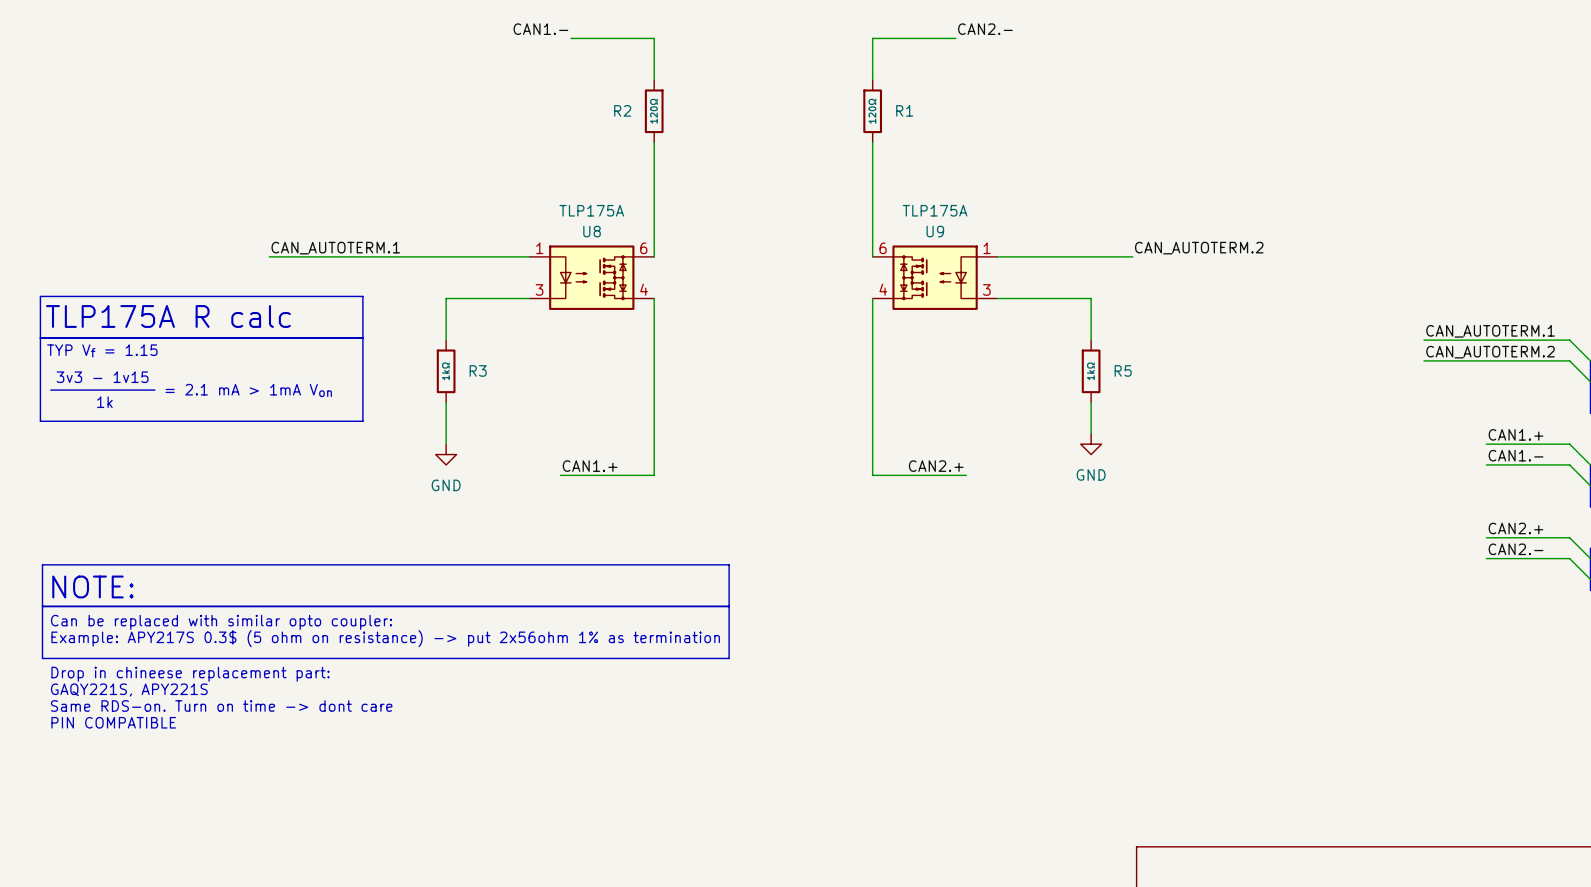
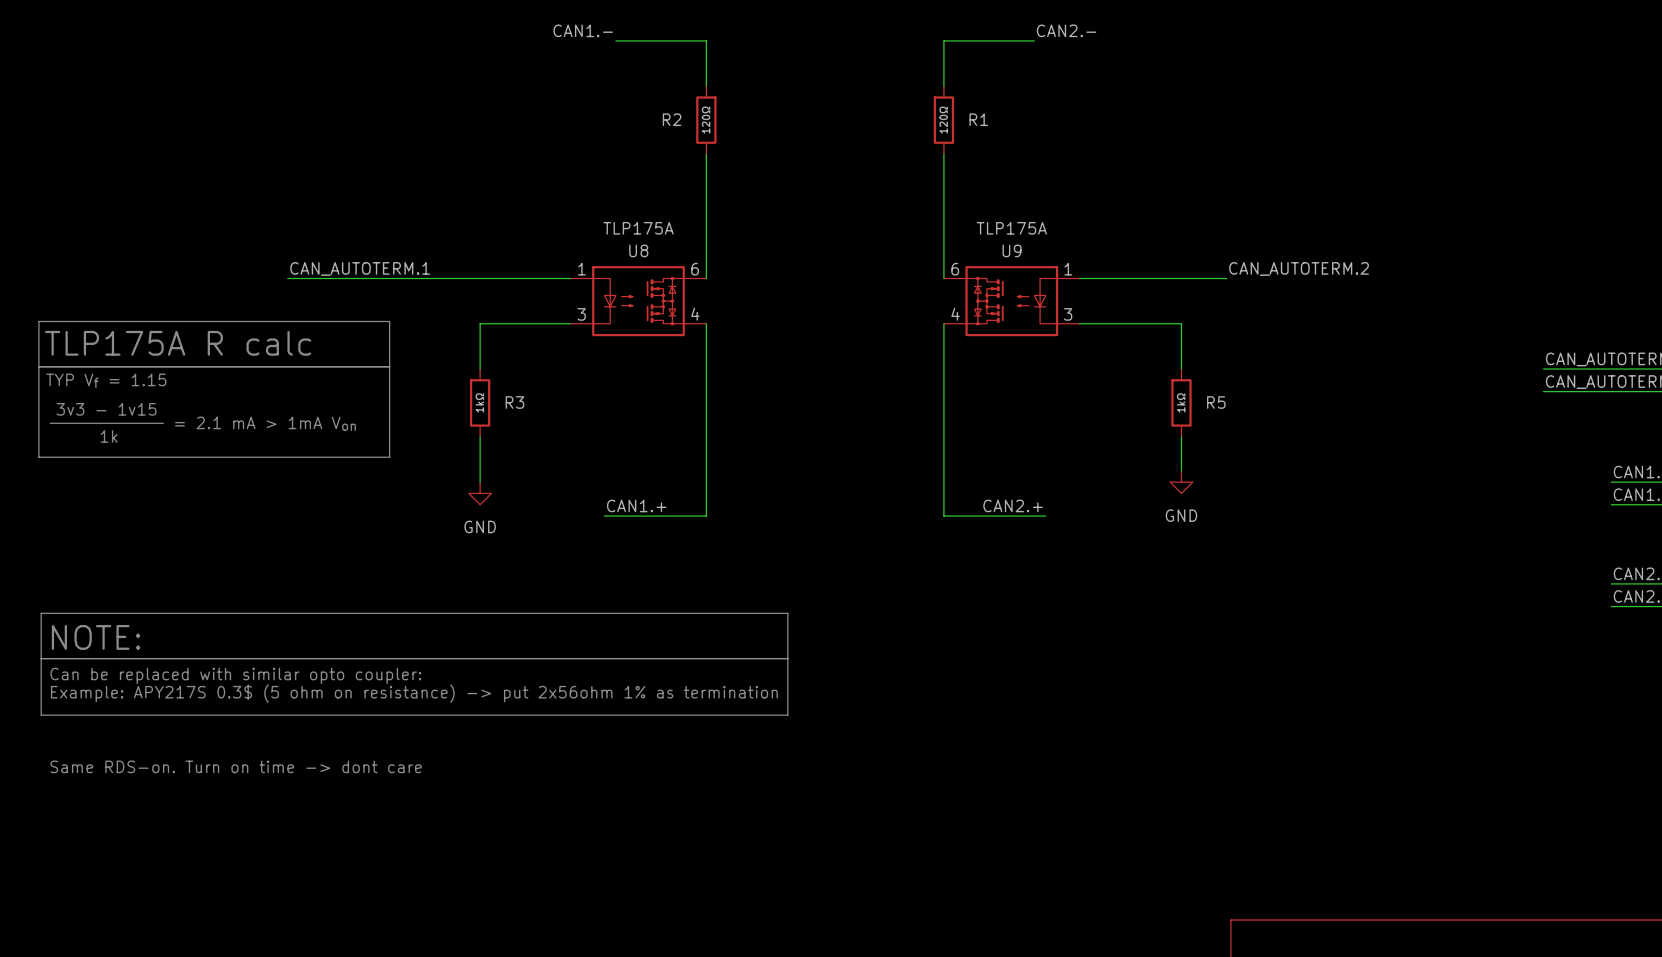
text: Drop in chineese replacement part: (190, 674) -> none
text: GAQY221S, APY221S (129, 690) -> none
text: PIN COMPATIBLE (113, 722) -> none

